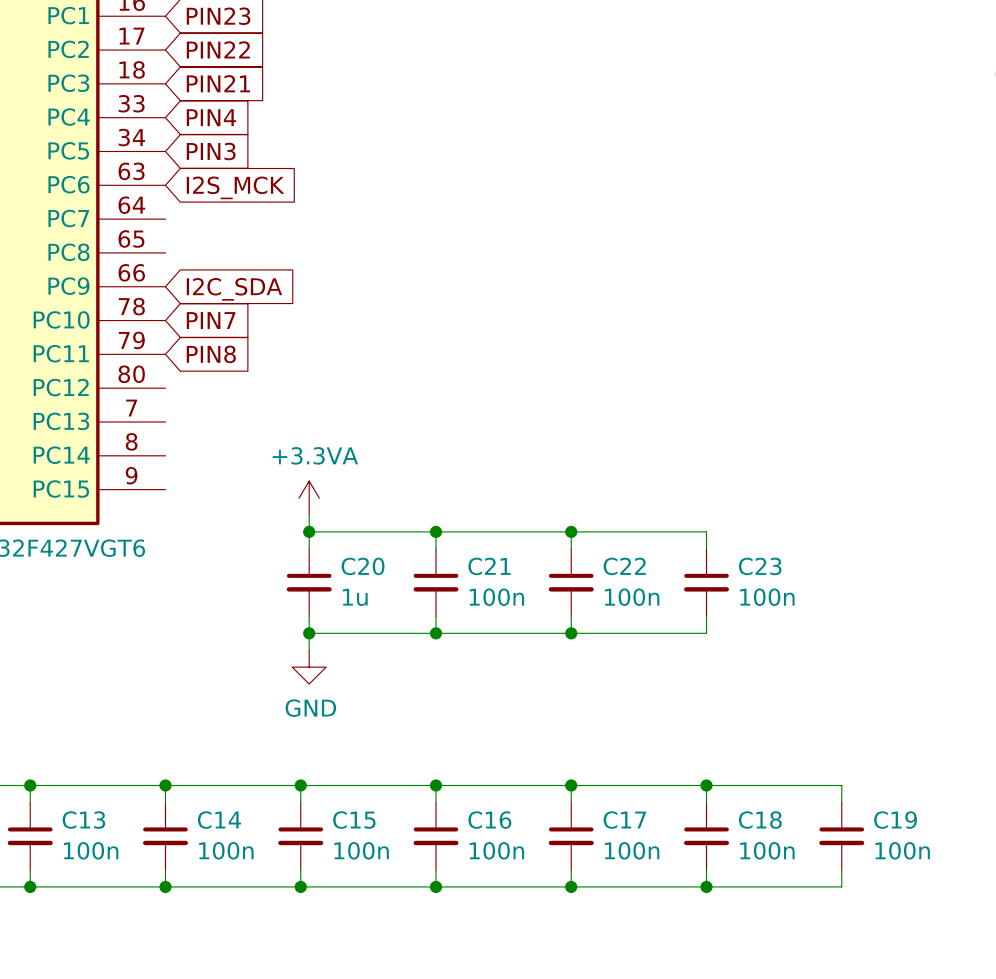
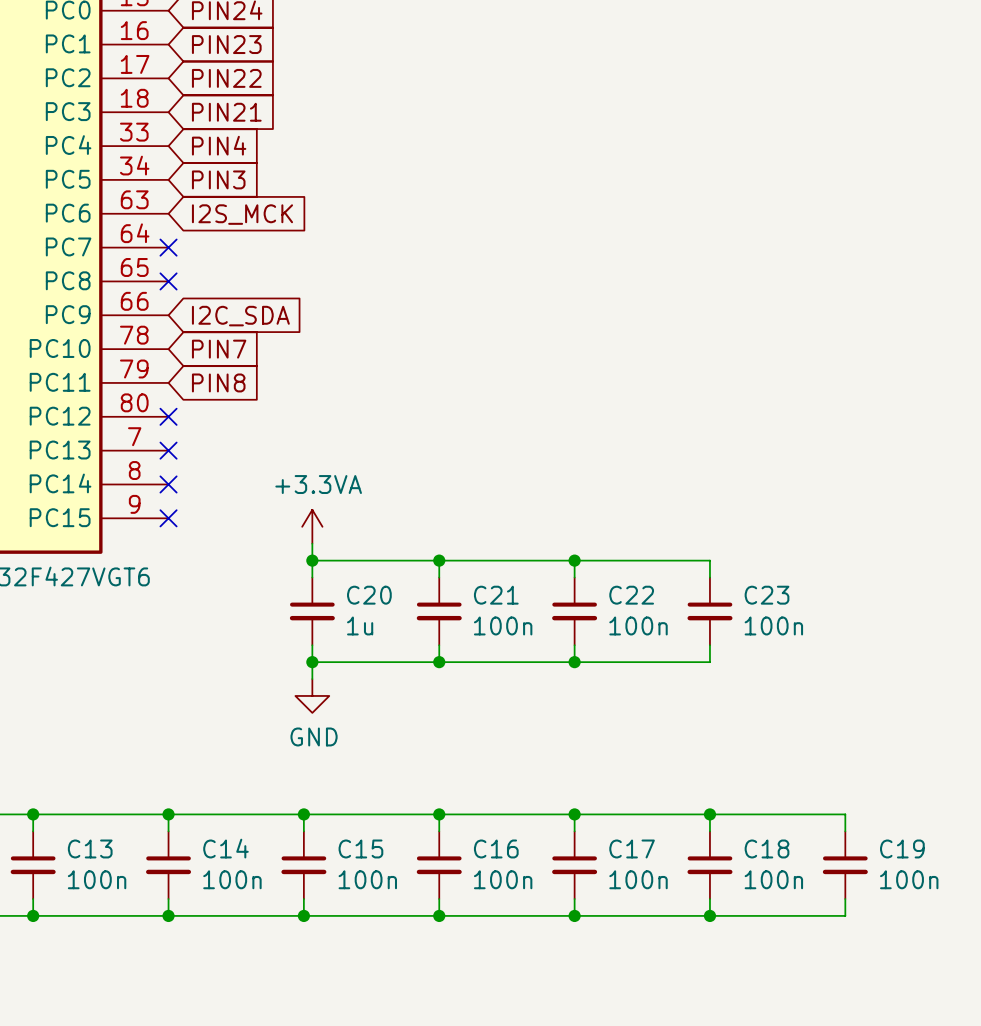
no-connect mark: none -> (168, 247)
no-connect mark: none -> (168, 281)
no-connect mark: none -> (168, 416)
no-connect mark: none -> (168, 450)
no-connect mark: none -> (168, 484)
no-connect mark: none -> (168, 518)

